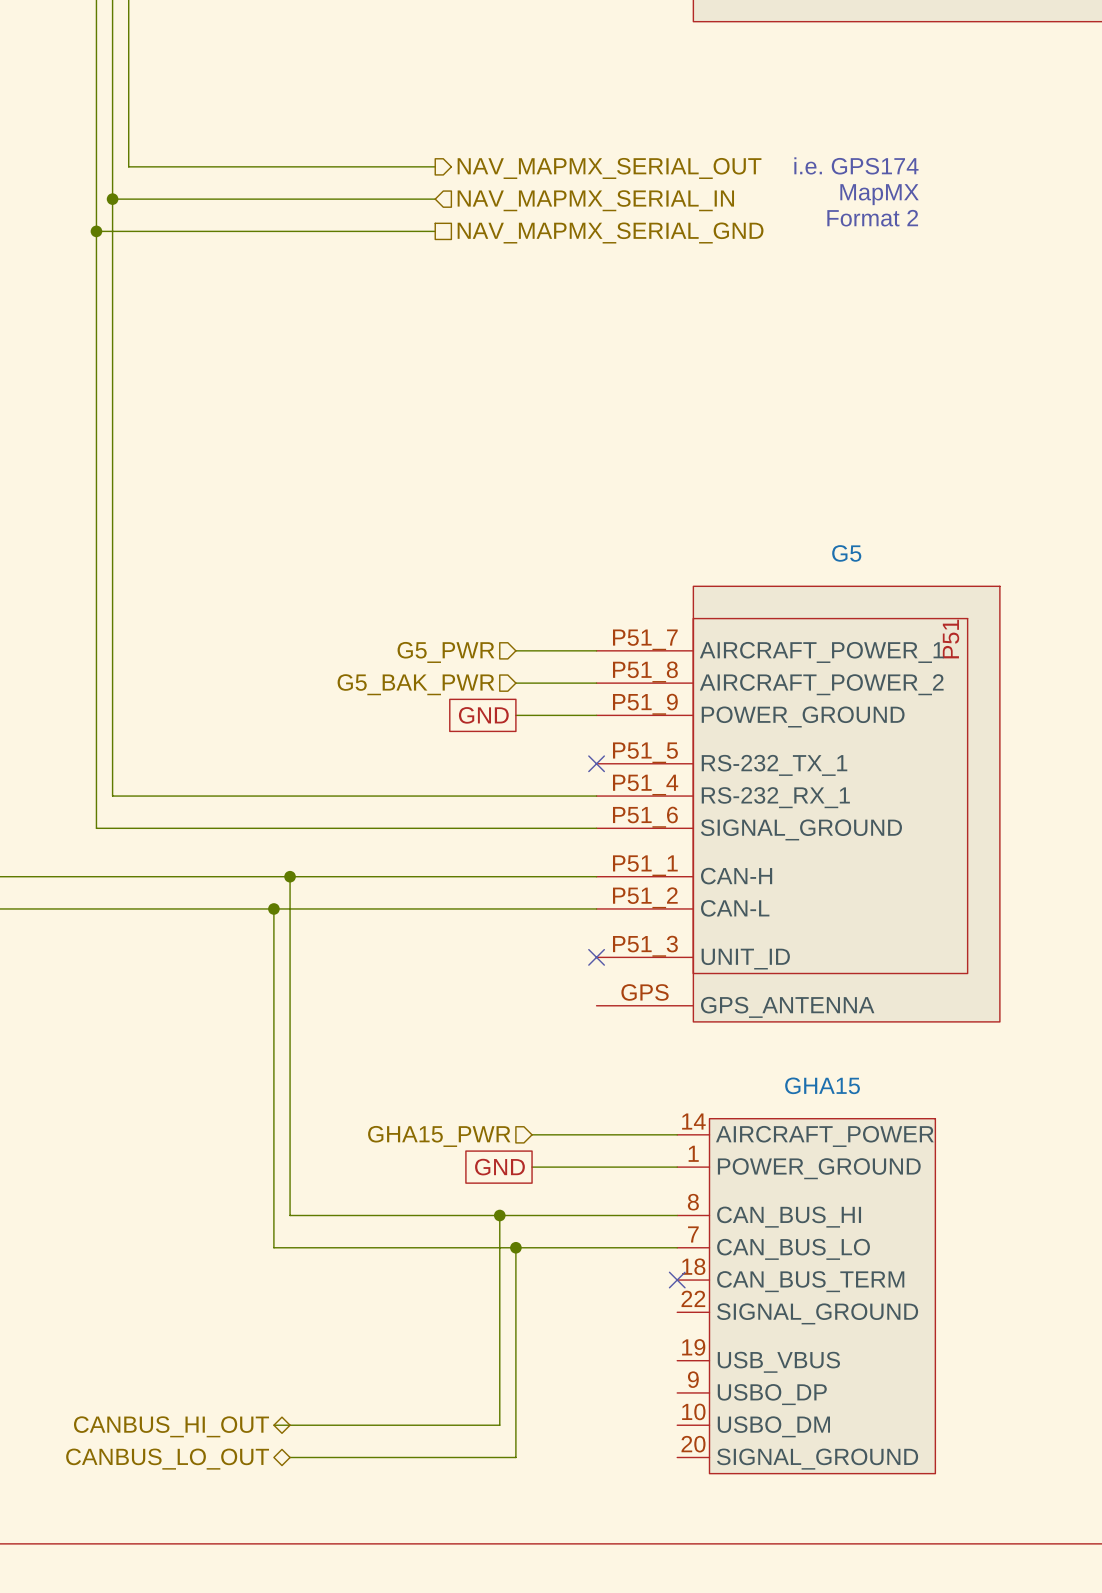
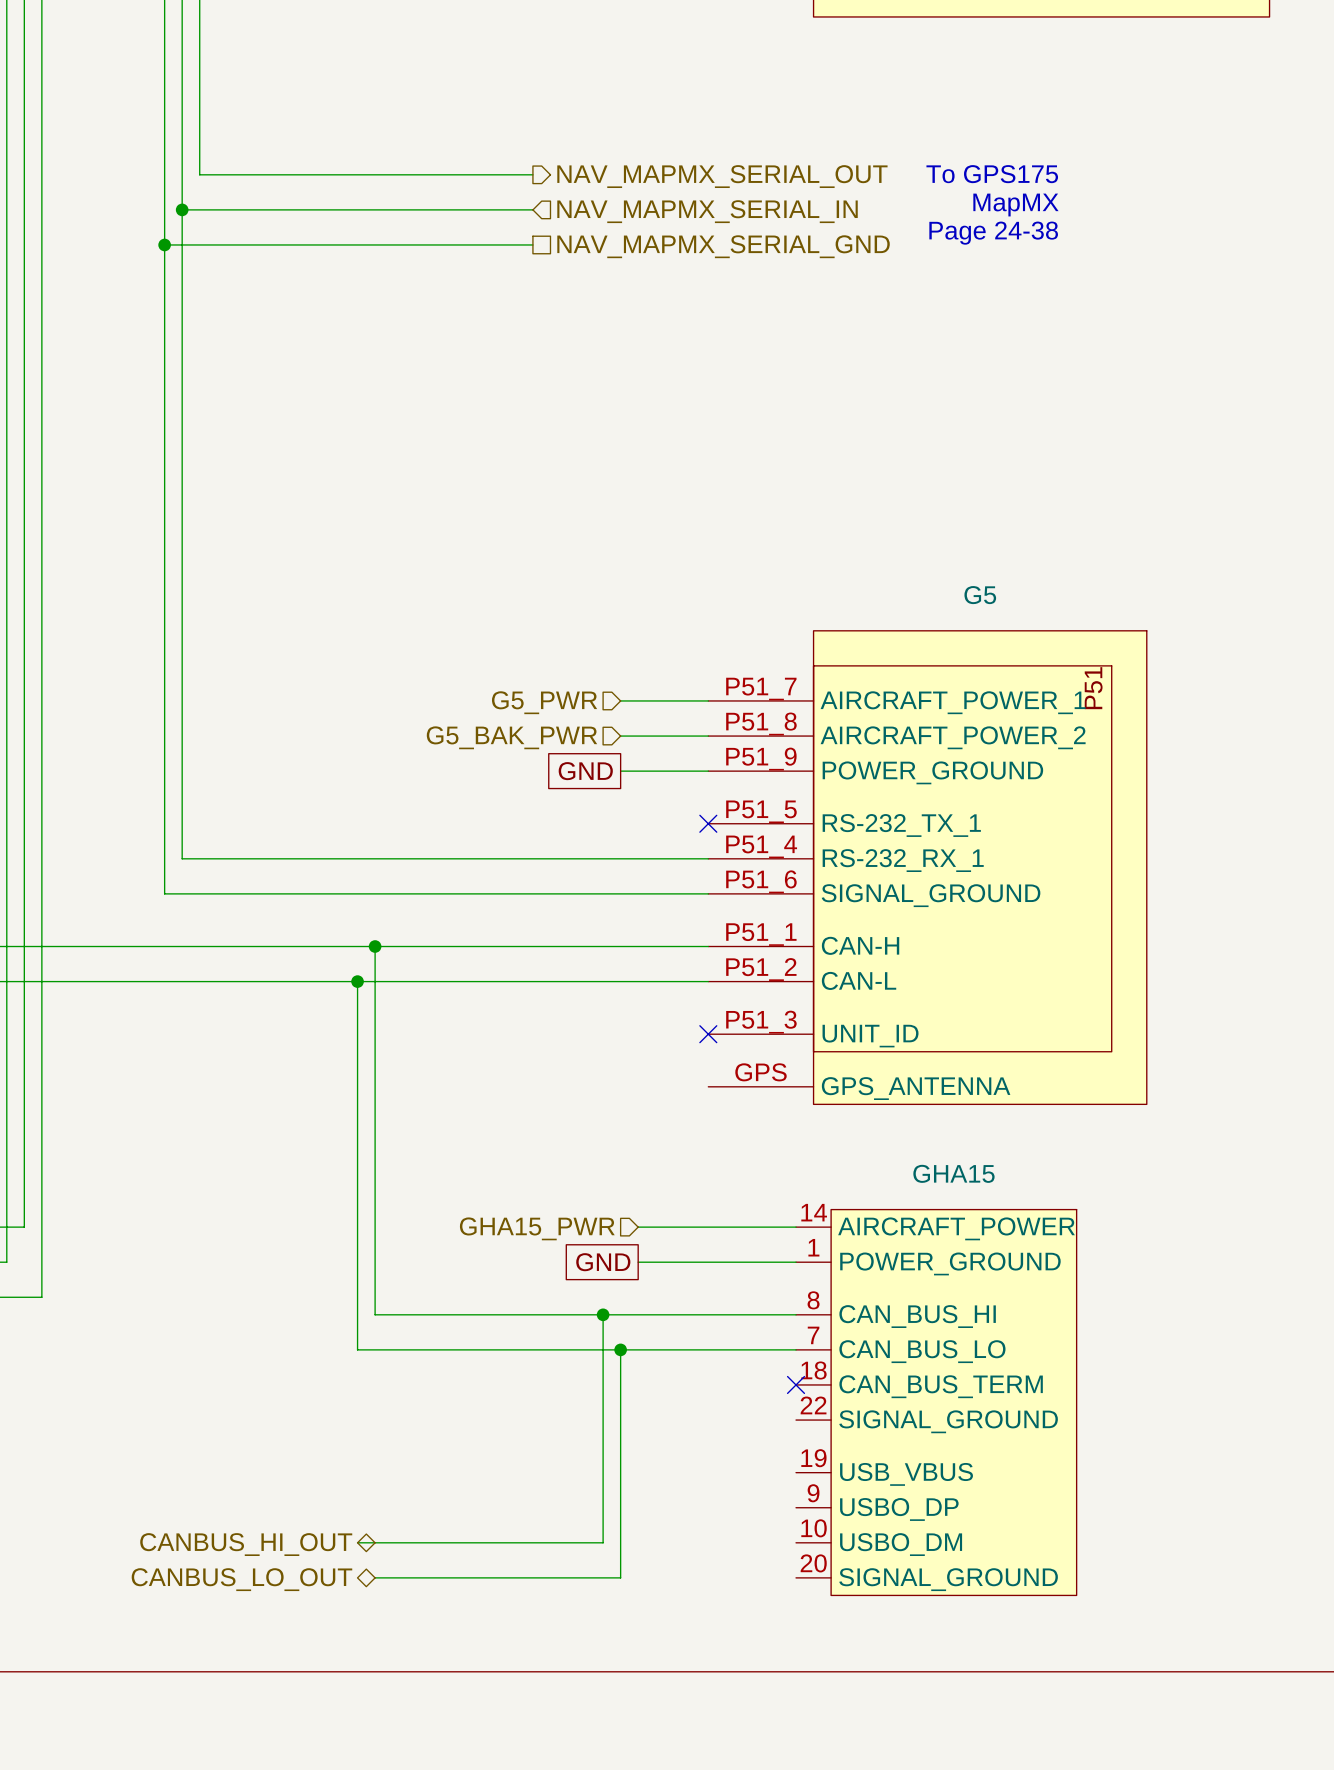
text: i.e. GPS174 (856, 165) -> To GPS175 (992, 174)
text: Format 2 (872, 218) -> Page 24-38 (993, 233)

